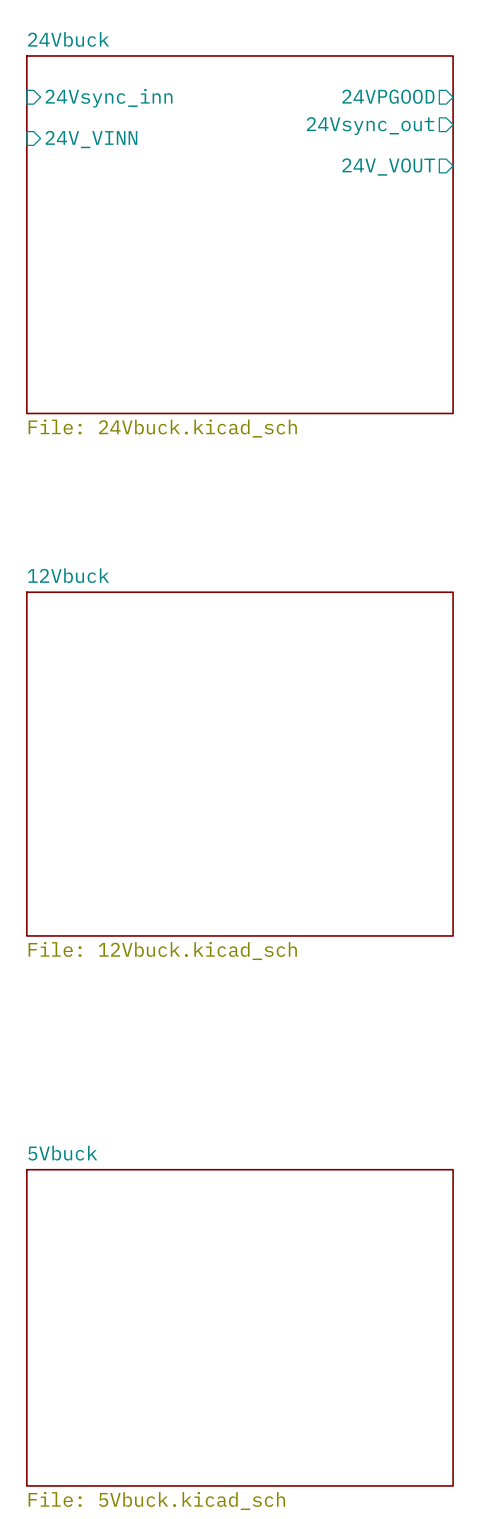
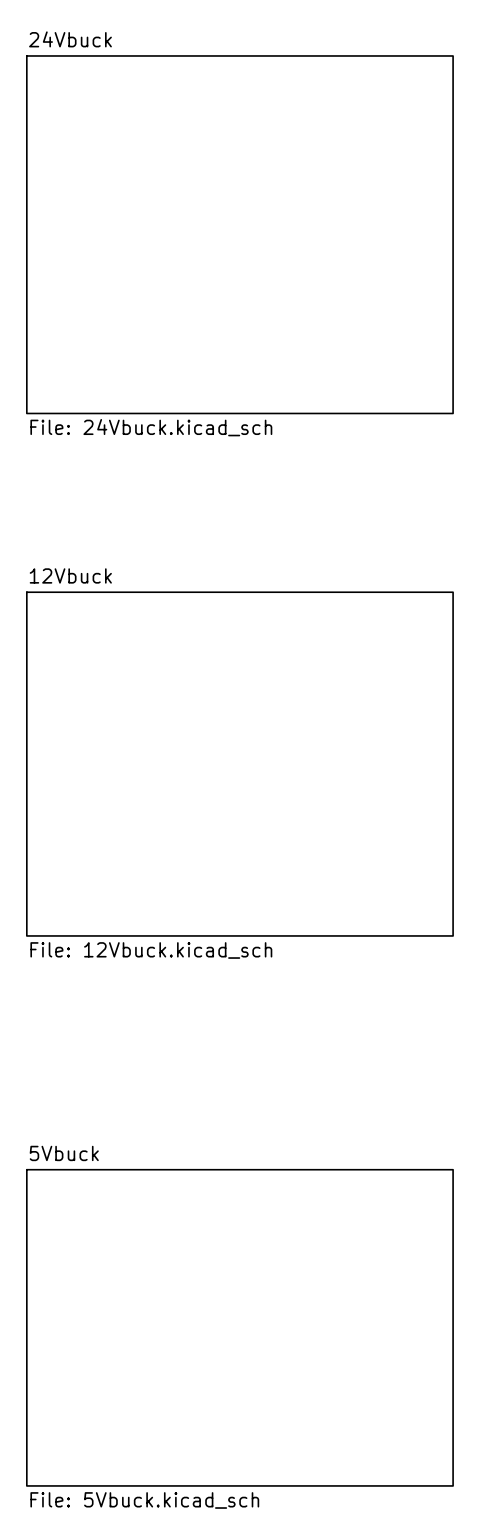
sheet pin: 24VPGOOD (388, 96) -> none
sheet pin: 24Vsync_inn (109, 98) -> none
sheet pin: 24Vsync_out (370, 126) -> none
sheet pin: 24V_VINN (91, 139) -> none
sheet pin: 24V_VOUT (388, 167) -> none

